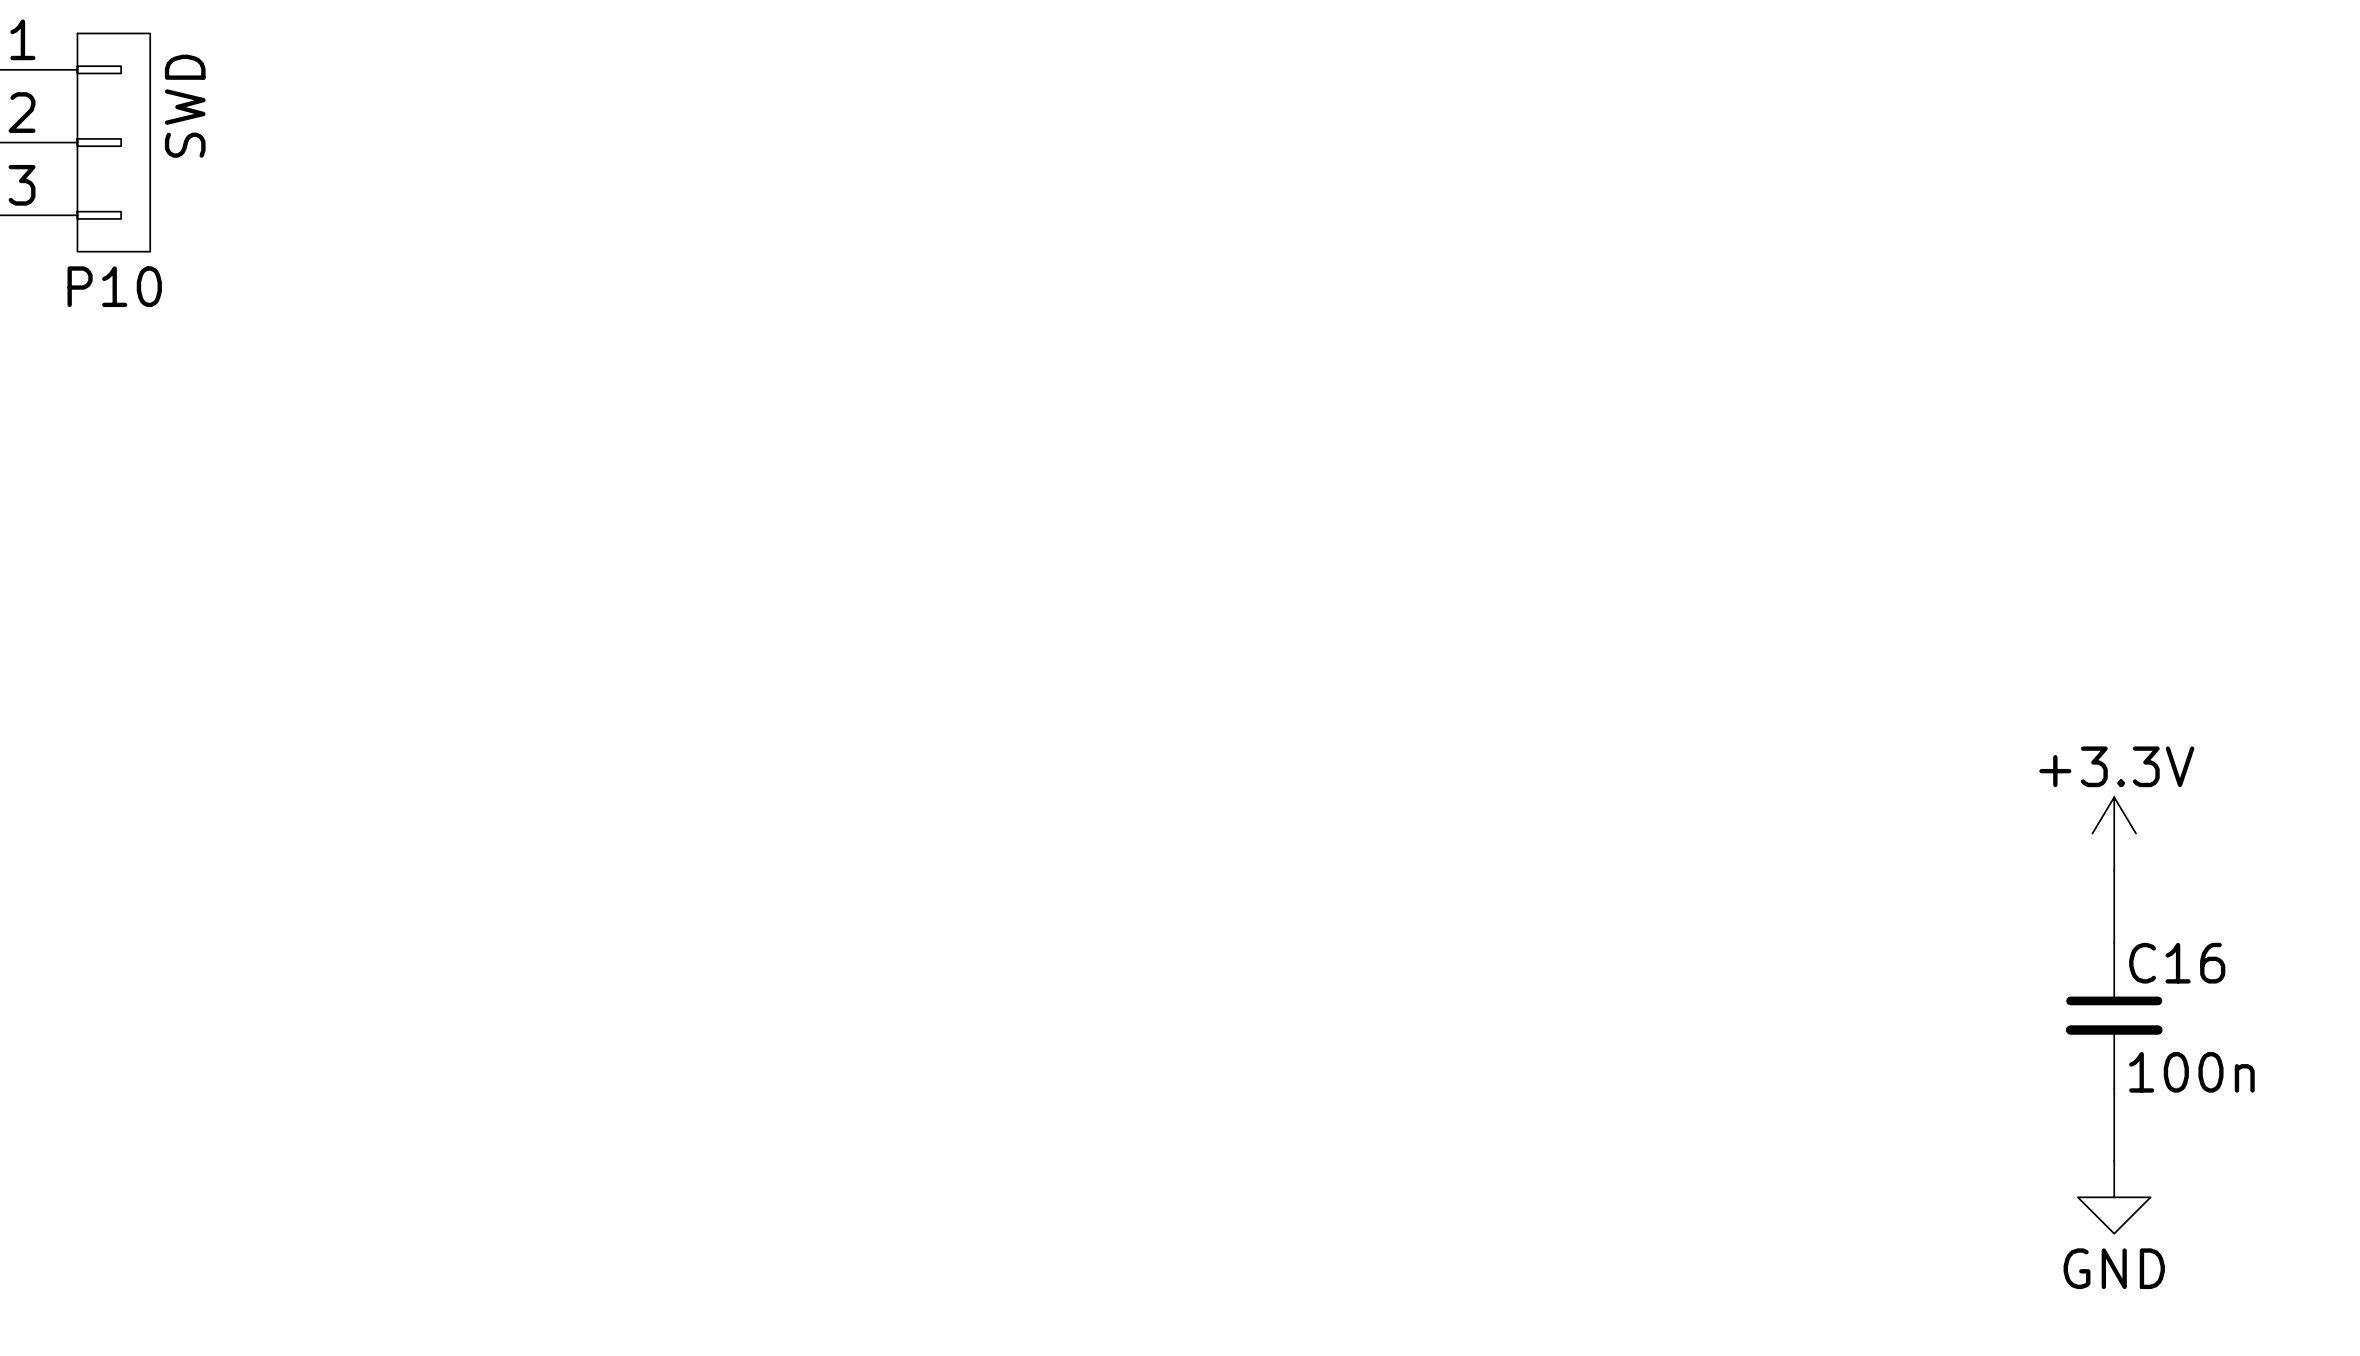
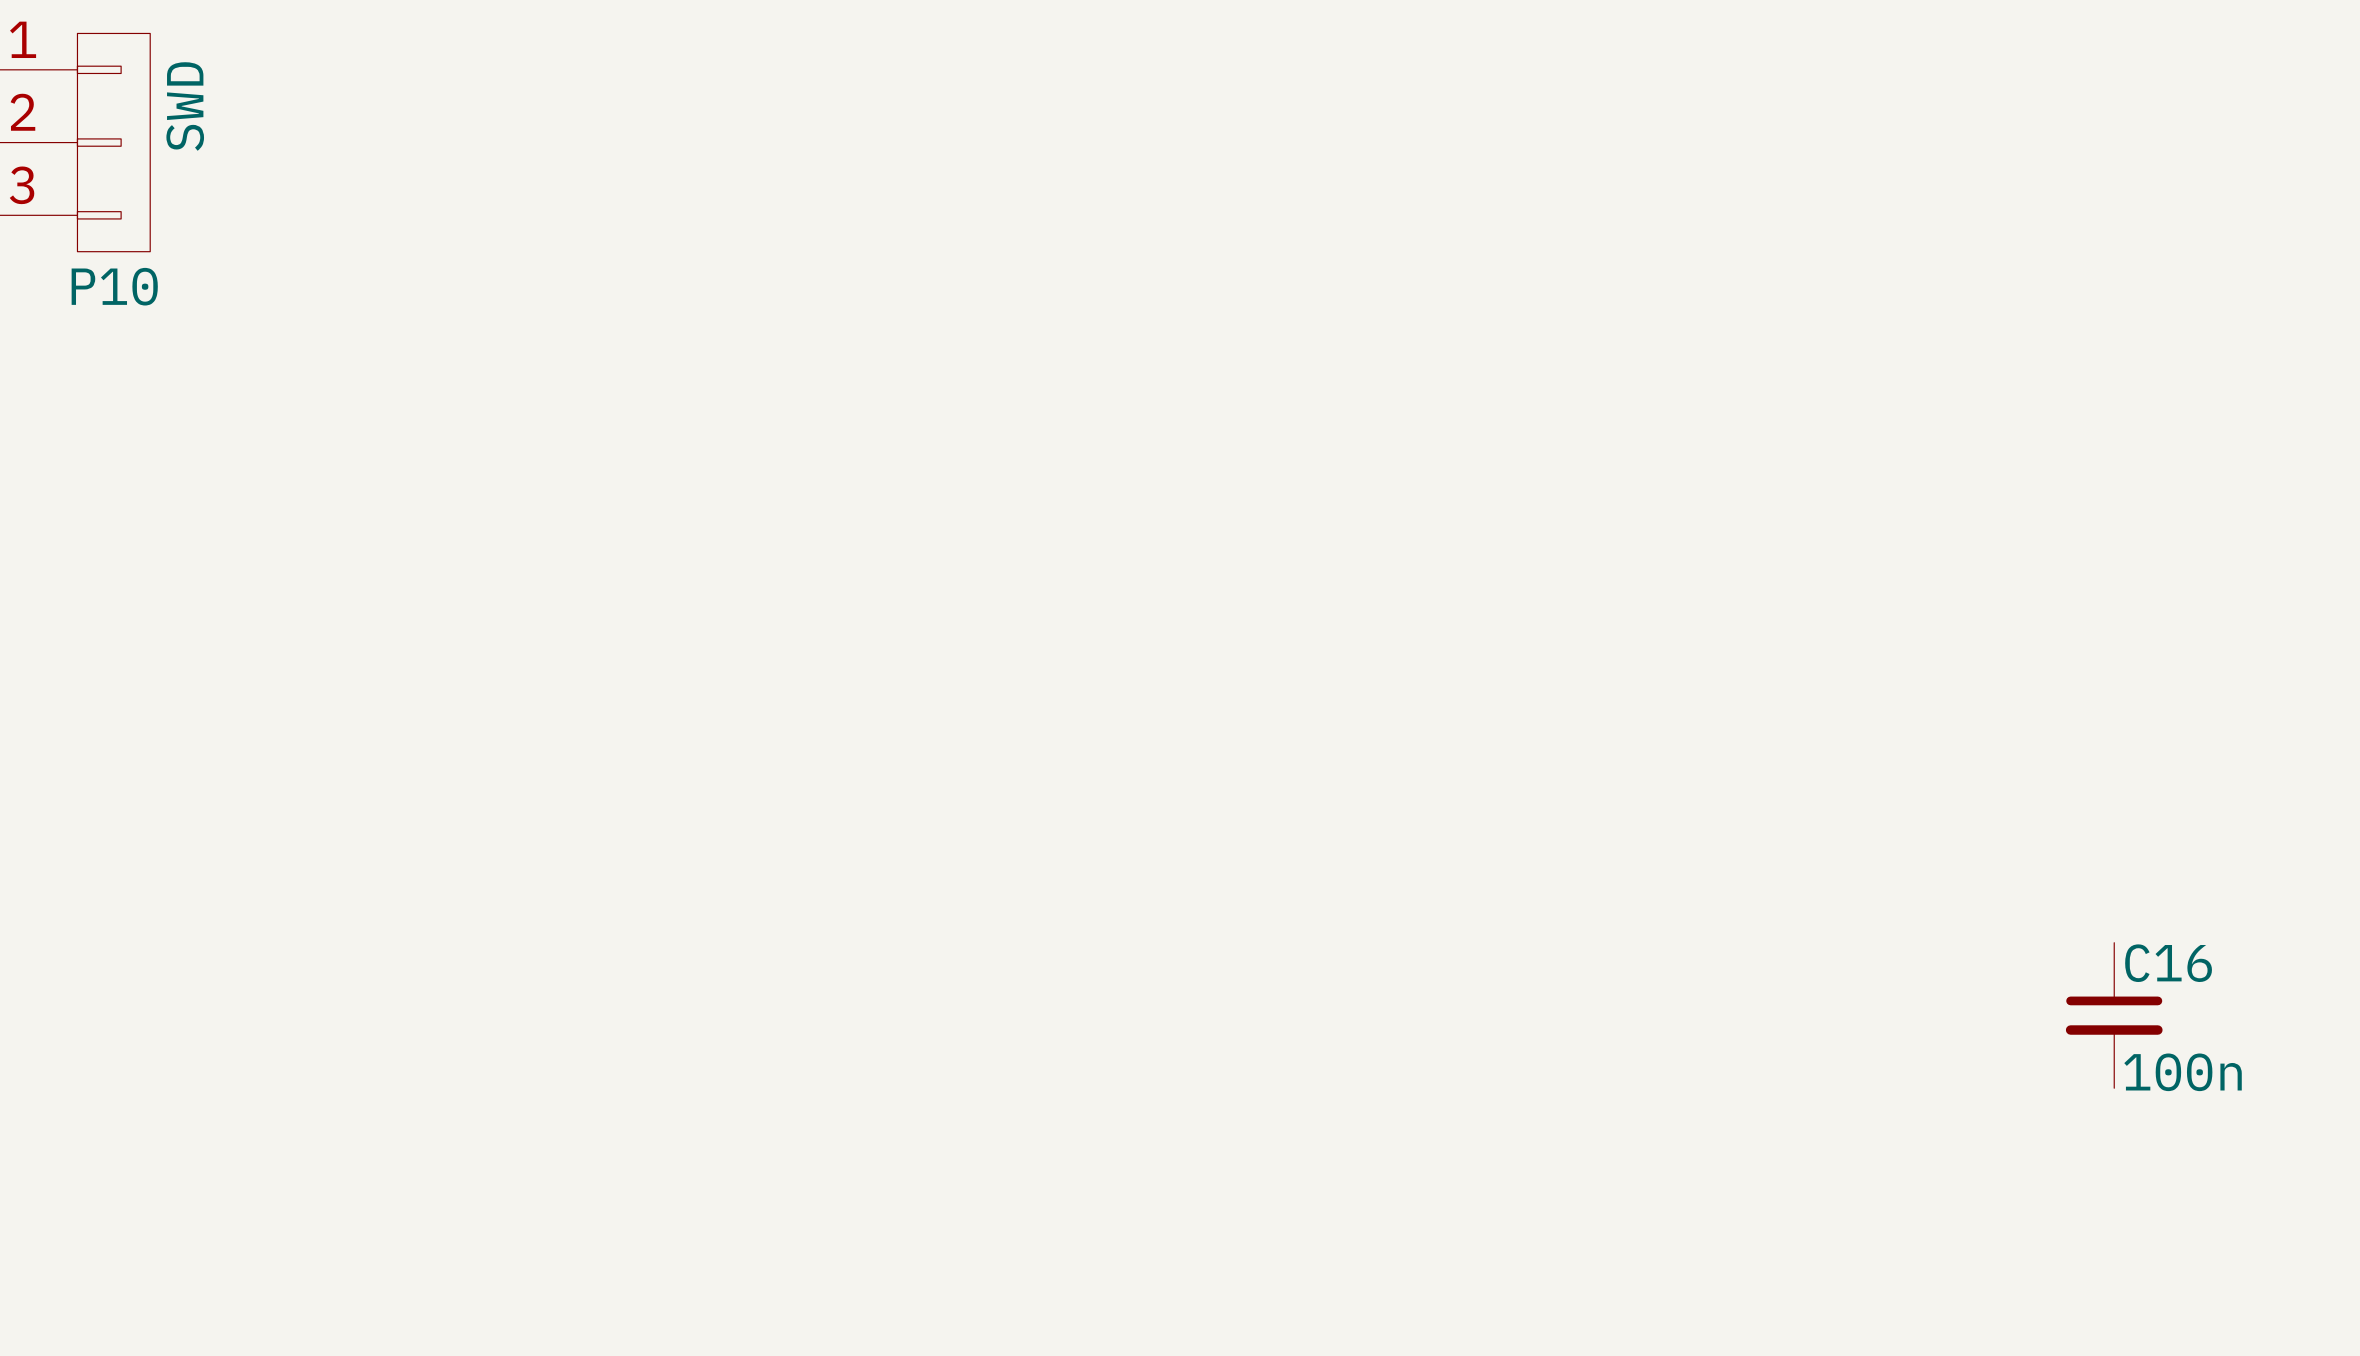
power symbol: +3.3V (2114, 833) -> none
wire: (2114, 869) (2114, 942) -> none
wire: (2114, 1088) (2114, 1160) -> none
power symbol: GND (2114, 1197) -> none

